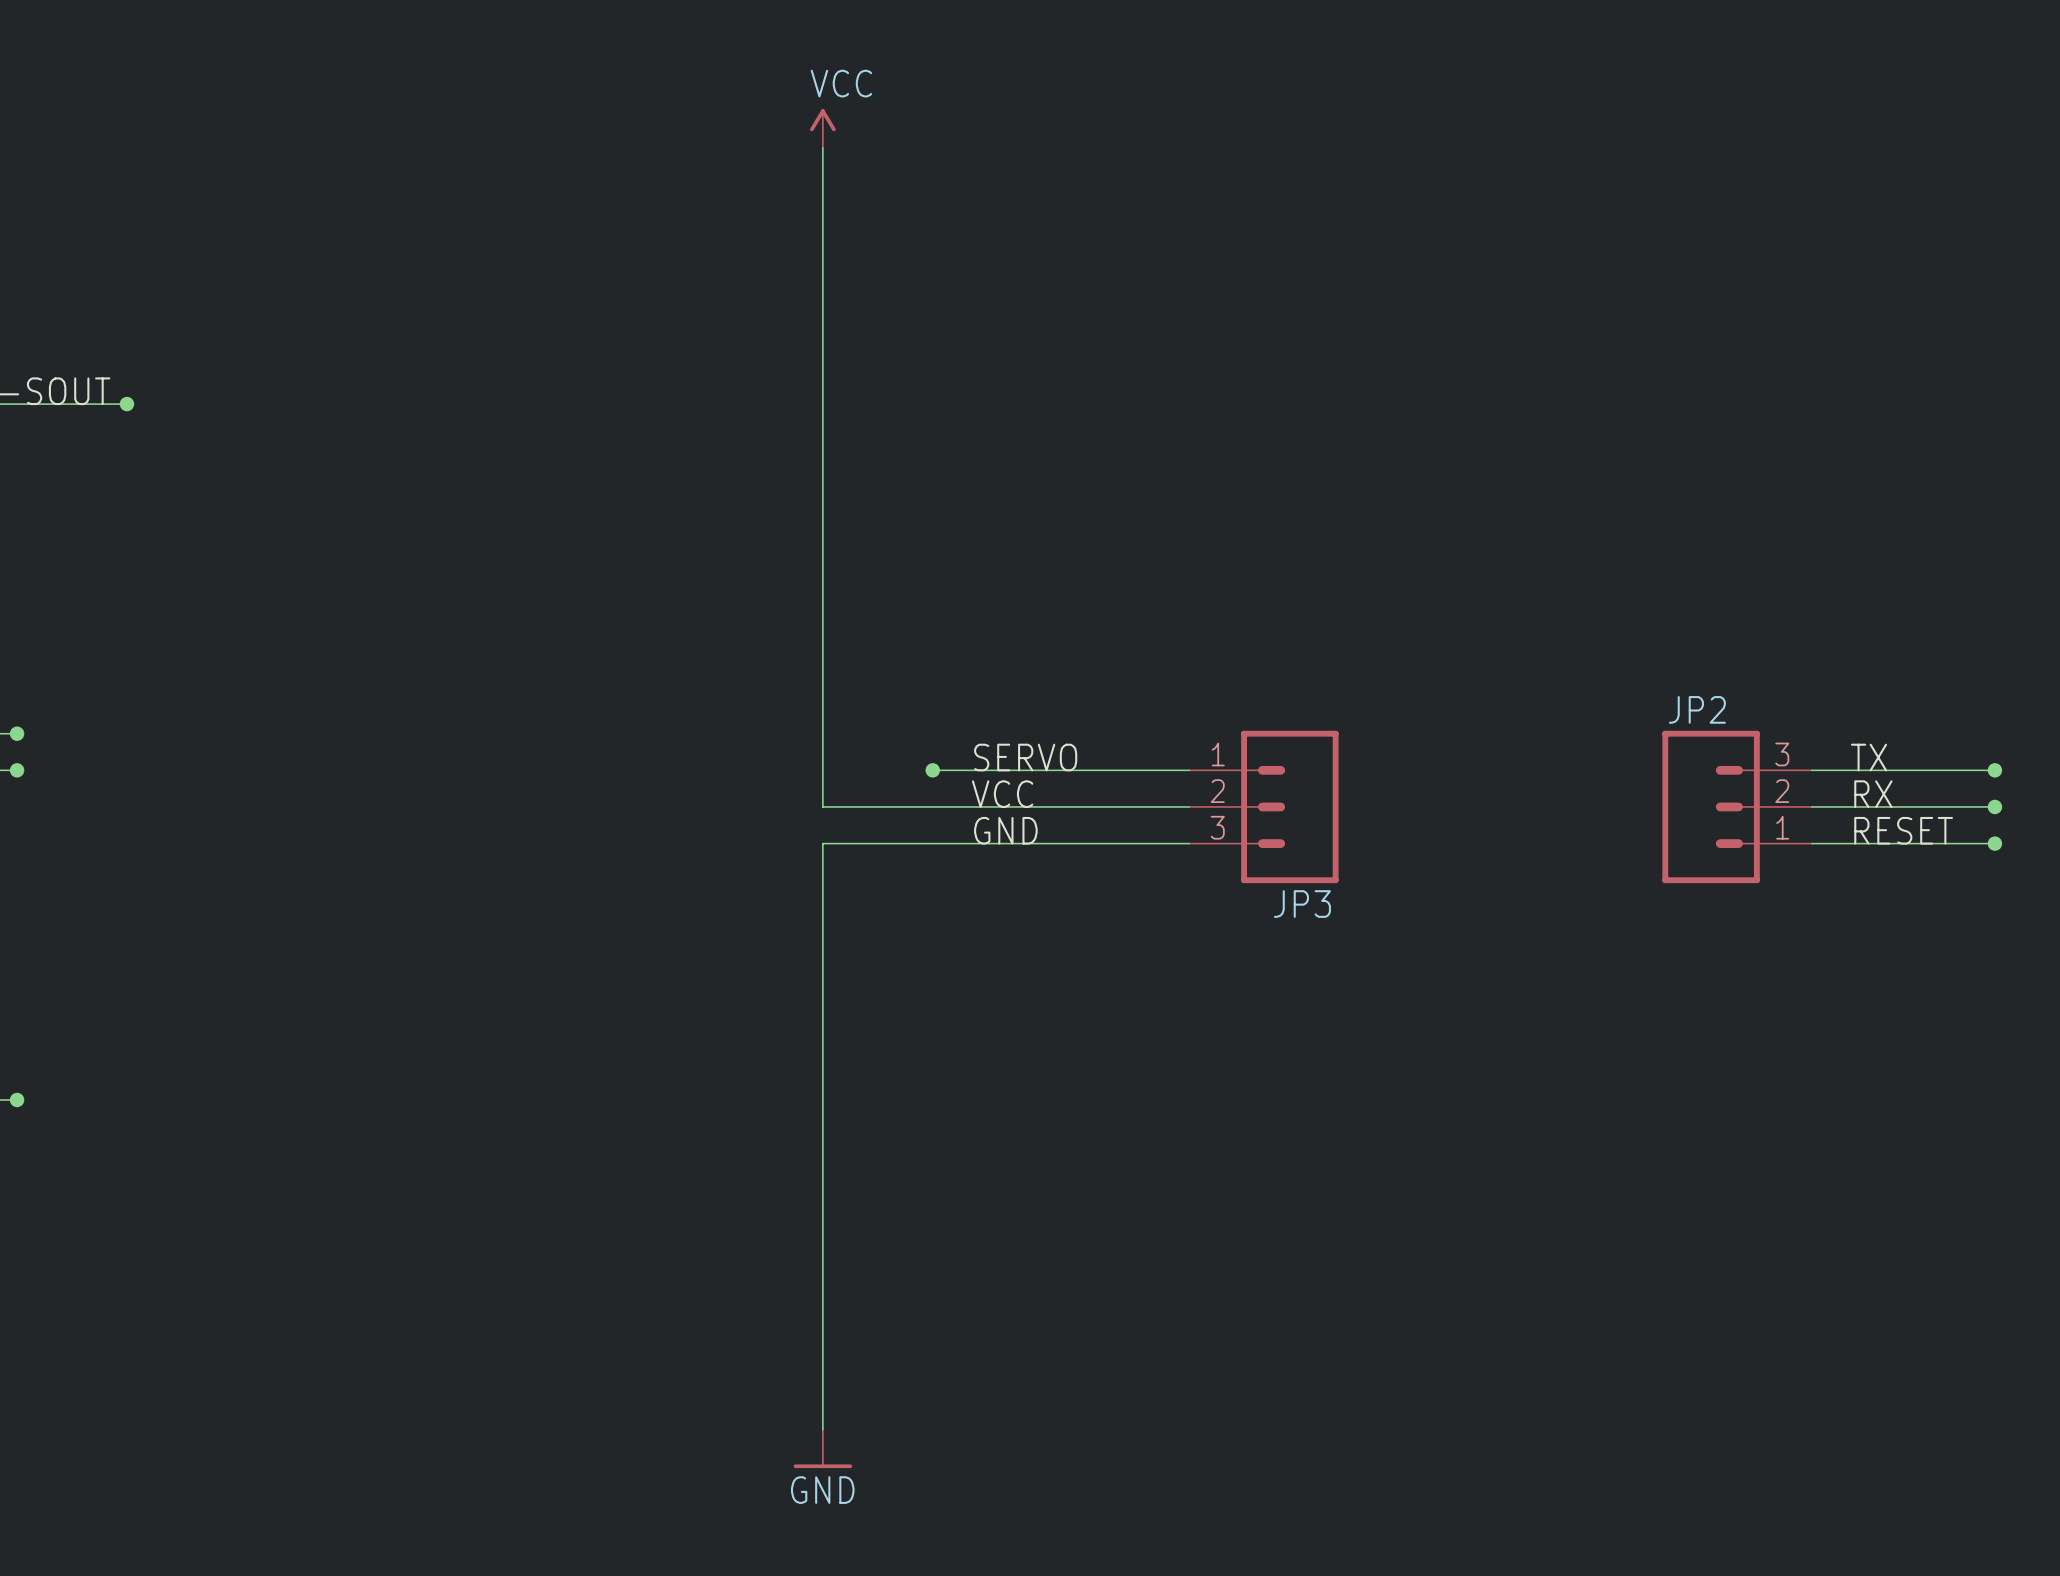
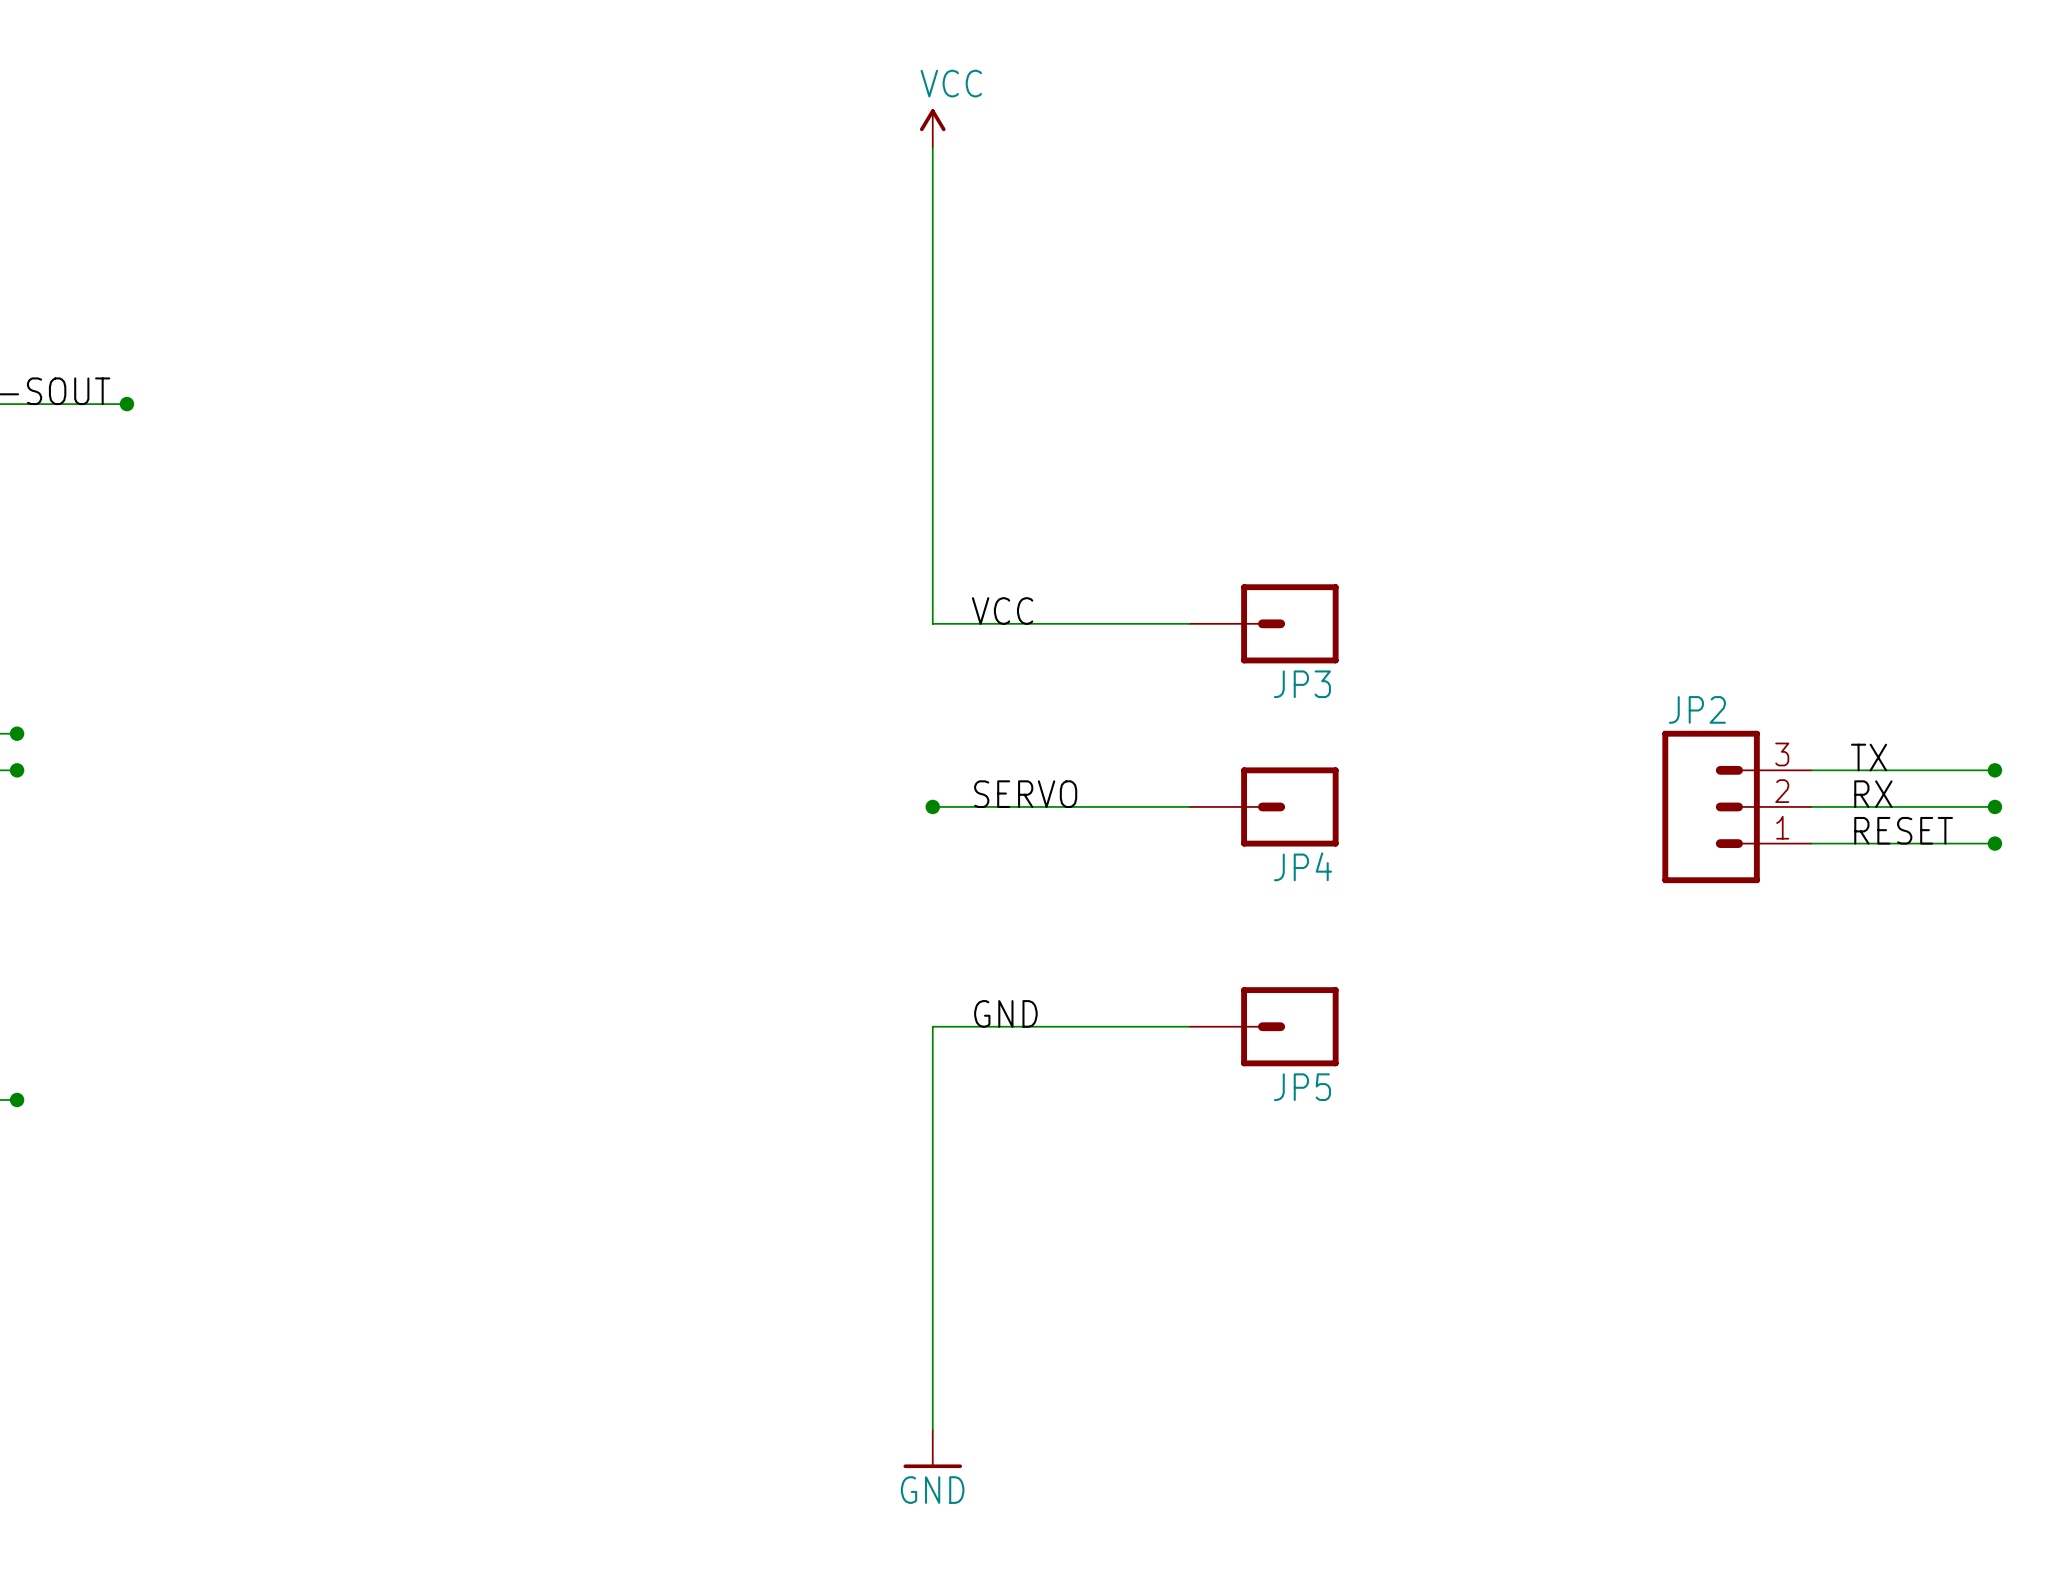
power symbol position: VCC (822, 128) -> VCC (932, 128)
wire: (822, 147) (822, 806) (932, 806) -> none
wire: none -> (932, 147) (932, 623) (1189, 623)
label: none -> VCC (1002, 611)
JP3 symbol: [1189, 730, 1339, 884] -> [1189, 584, 1339, 664]
label: SERVO (1025, 757) -> none
wire: (932, 770) (1189, 770) -> none
junction position: (932, 770) -> (932, 806)
label: VCC (1002, 794) -> SERVO (1025, 794)
JP4: none -> (1263, 806)
label position: GND (1005, 830) -> GND (1005, 1013)
wire: (1189, 843) (822, 843) (822, 1429) -> none
JP3 name position: JP3 (1302, 904) -> JP3 (1302, 684)
wire: none -> (1189, 1026) (932, 1026) (932, 1429)
JP5: none -> (1263, 1026)
power symbol position: GND (822, 1448) -> GND (932, 1448)

